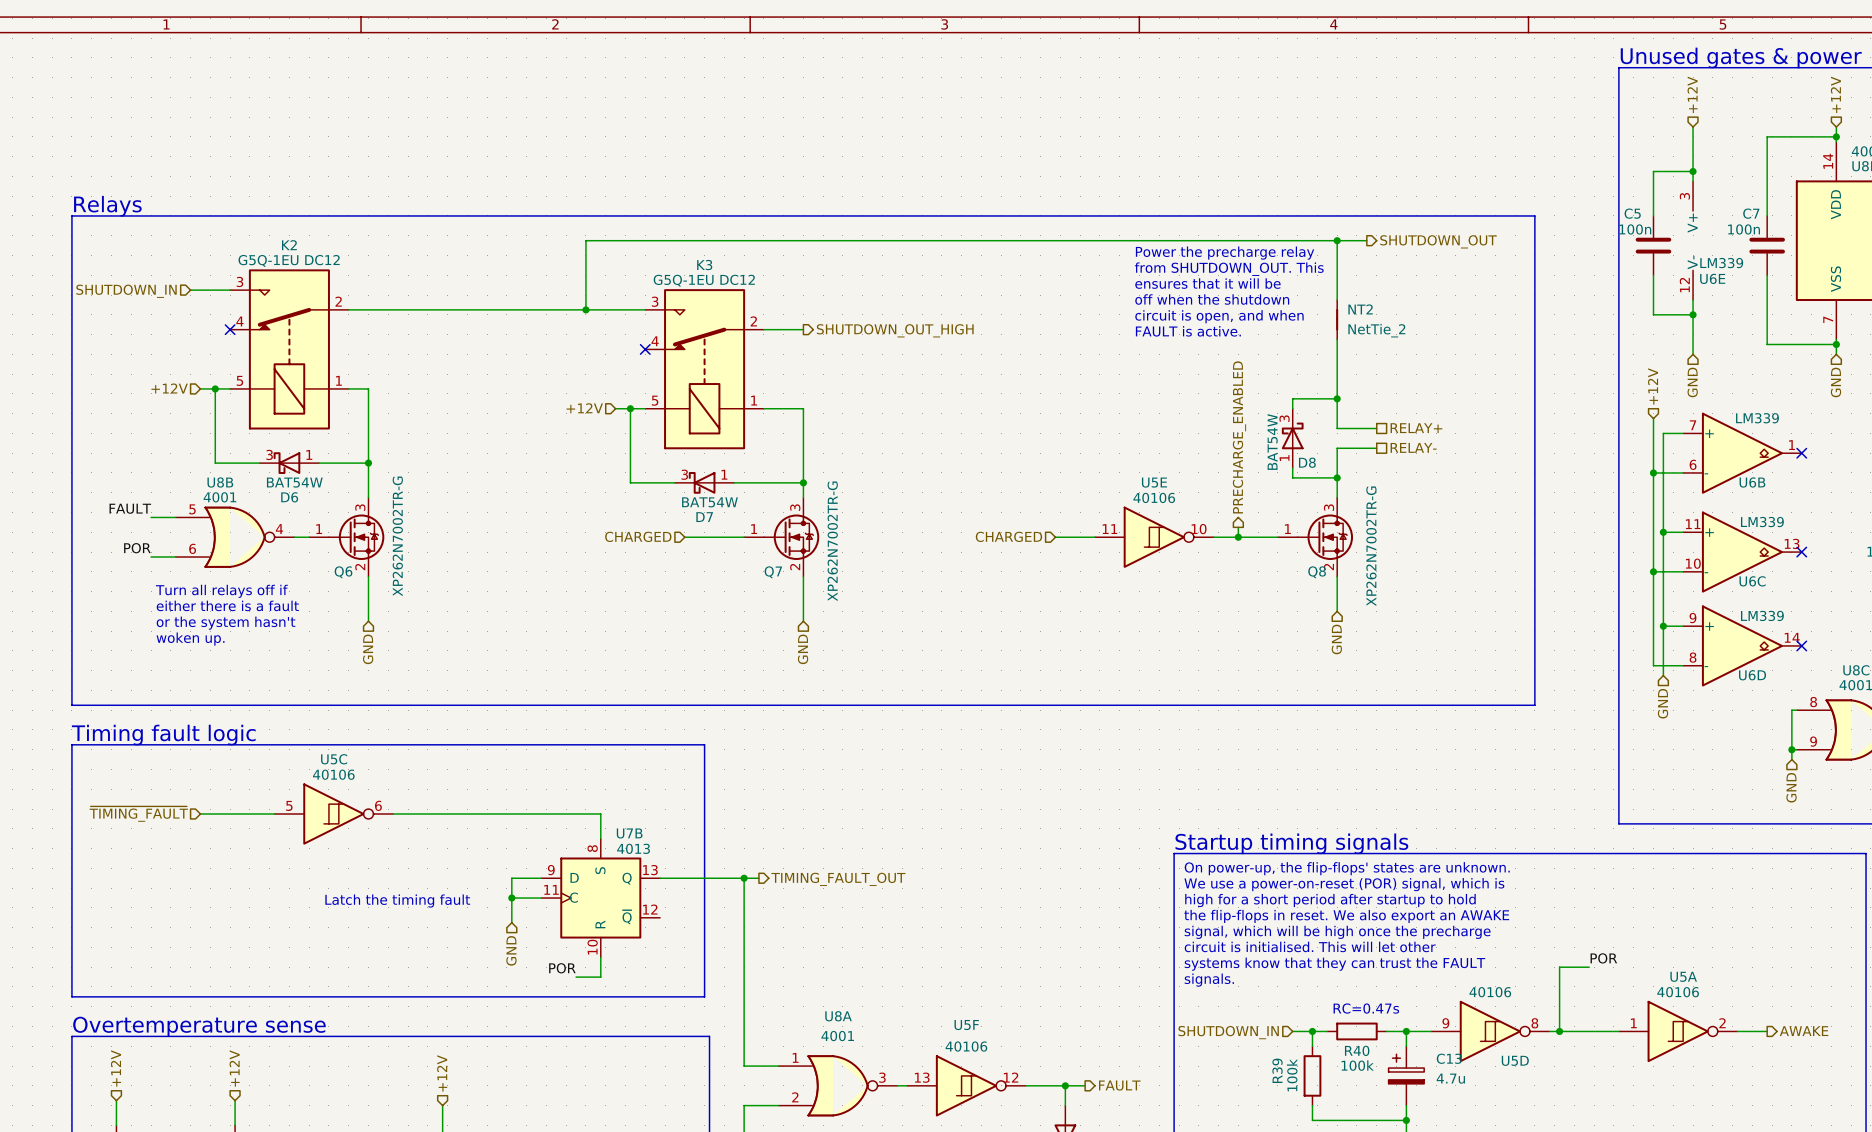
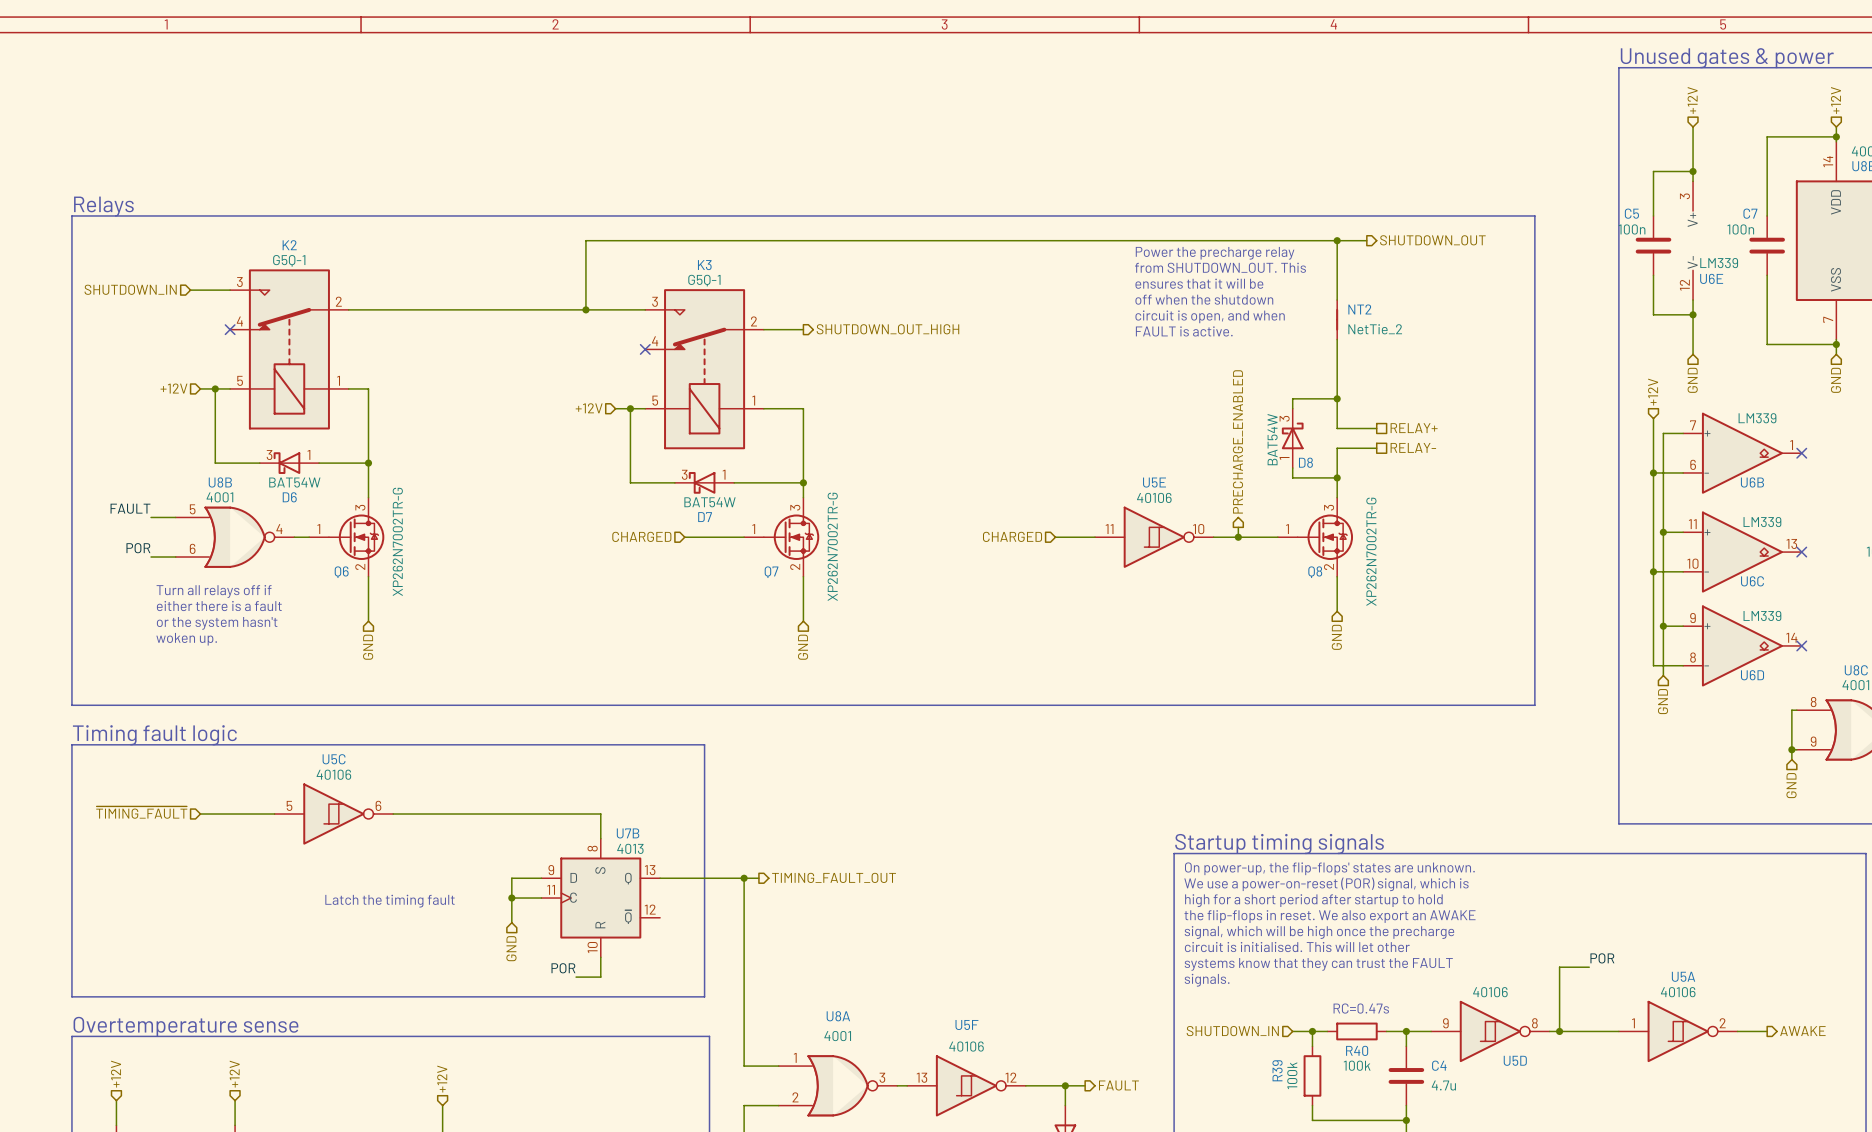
K2 value: G5Q-1EU DC12 (289, 260) -> G5Q-1 (289, 260)
K3 value: G5Q-1EU DC12 (704, 280) -> G5Q-1 (704, 280)
C13: 4.7u (1406, 1075) -> none
C4: none -> 4.7u (1406, 1075)

